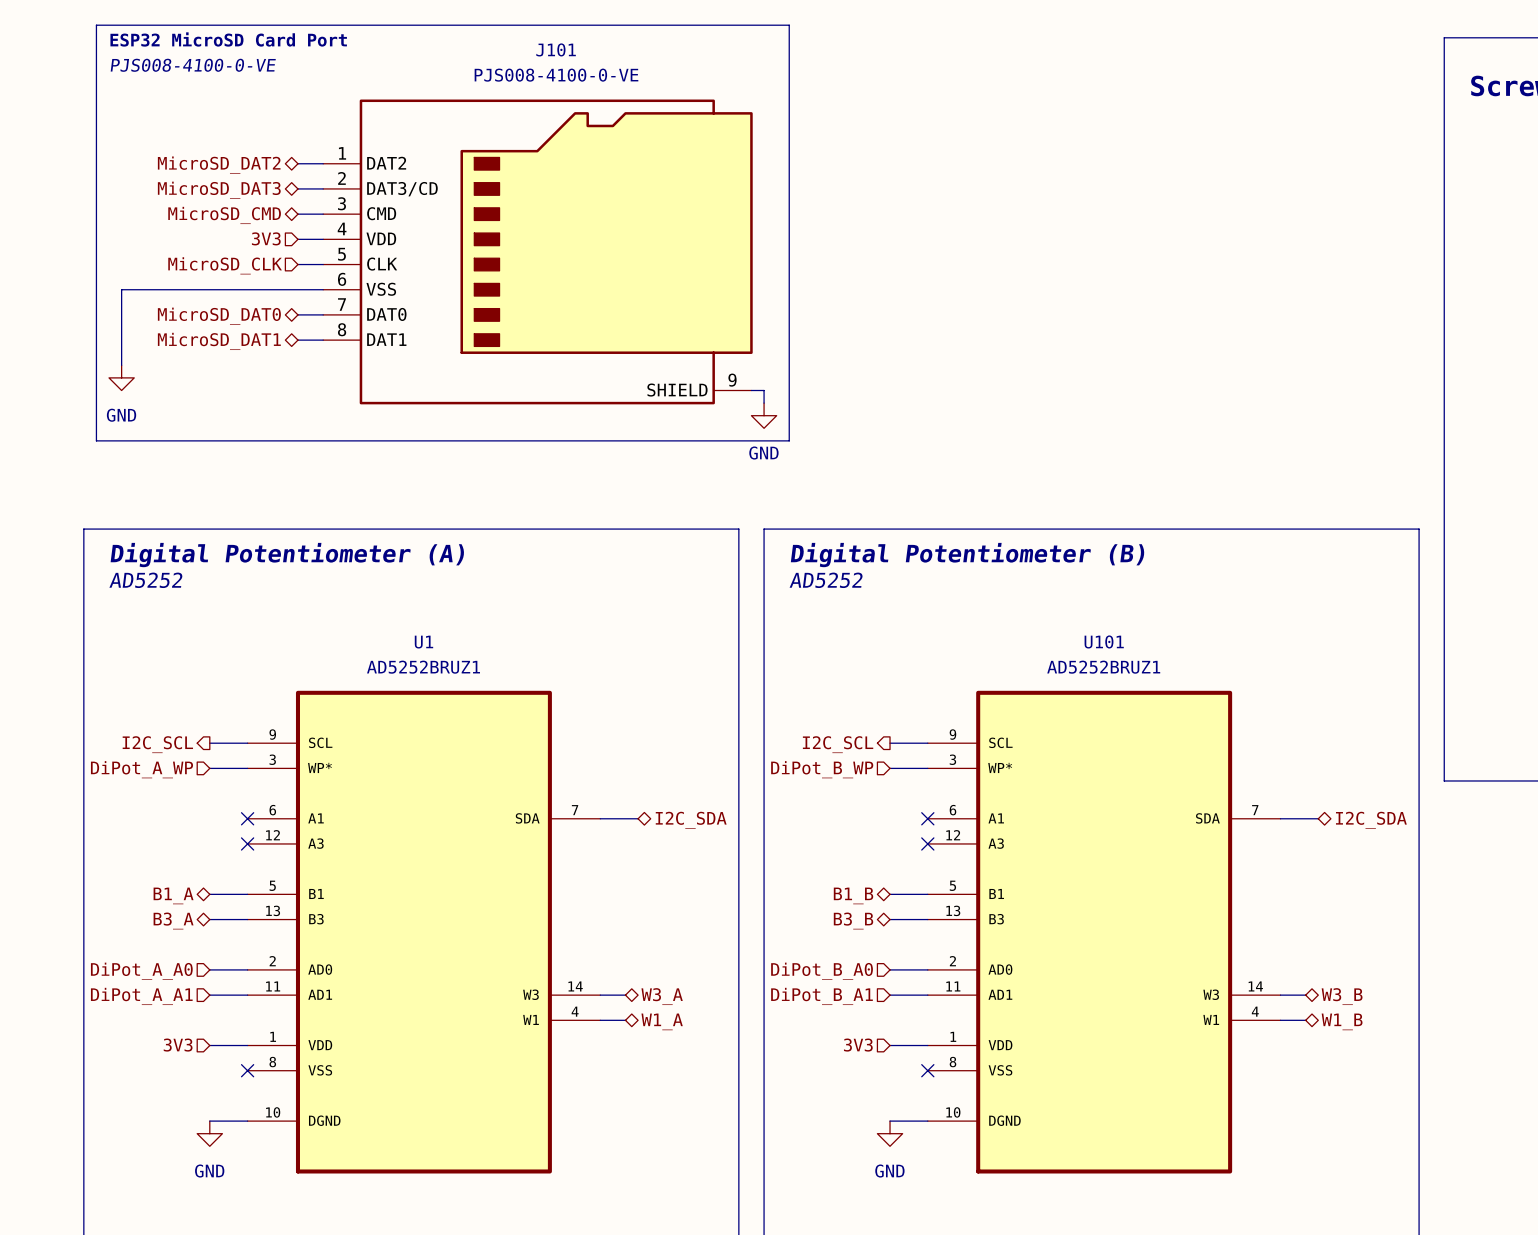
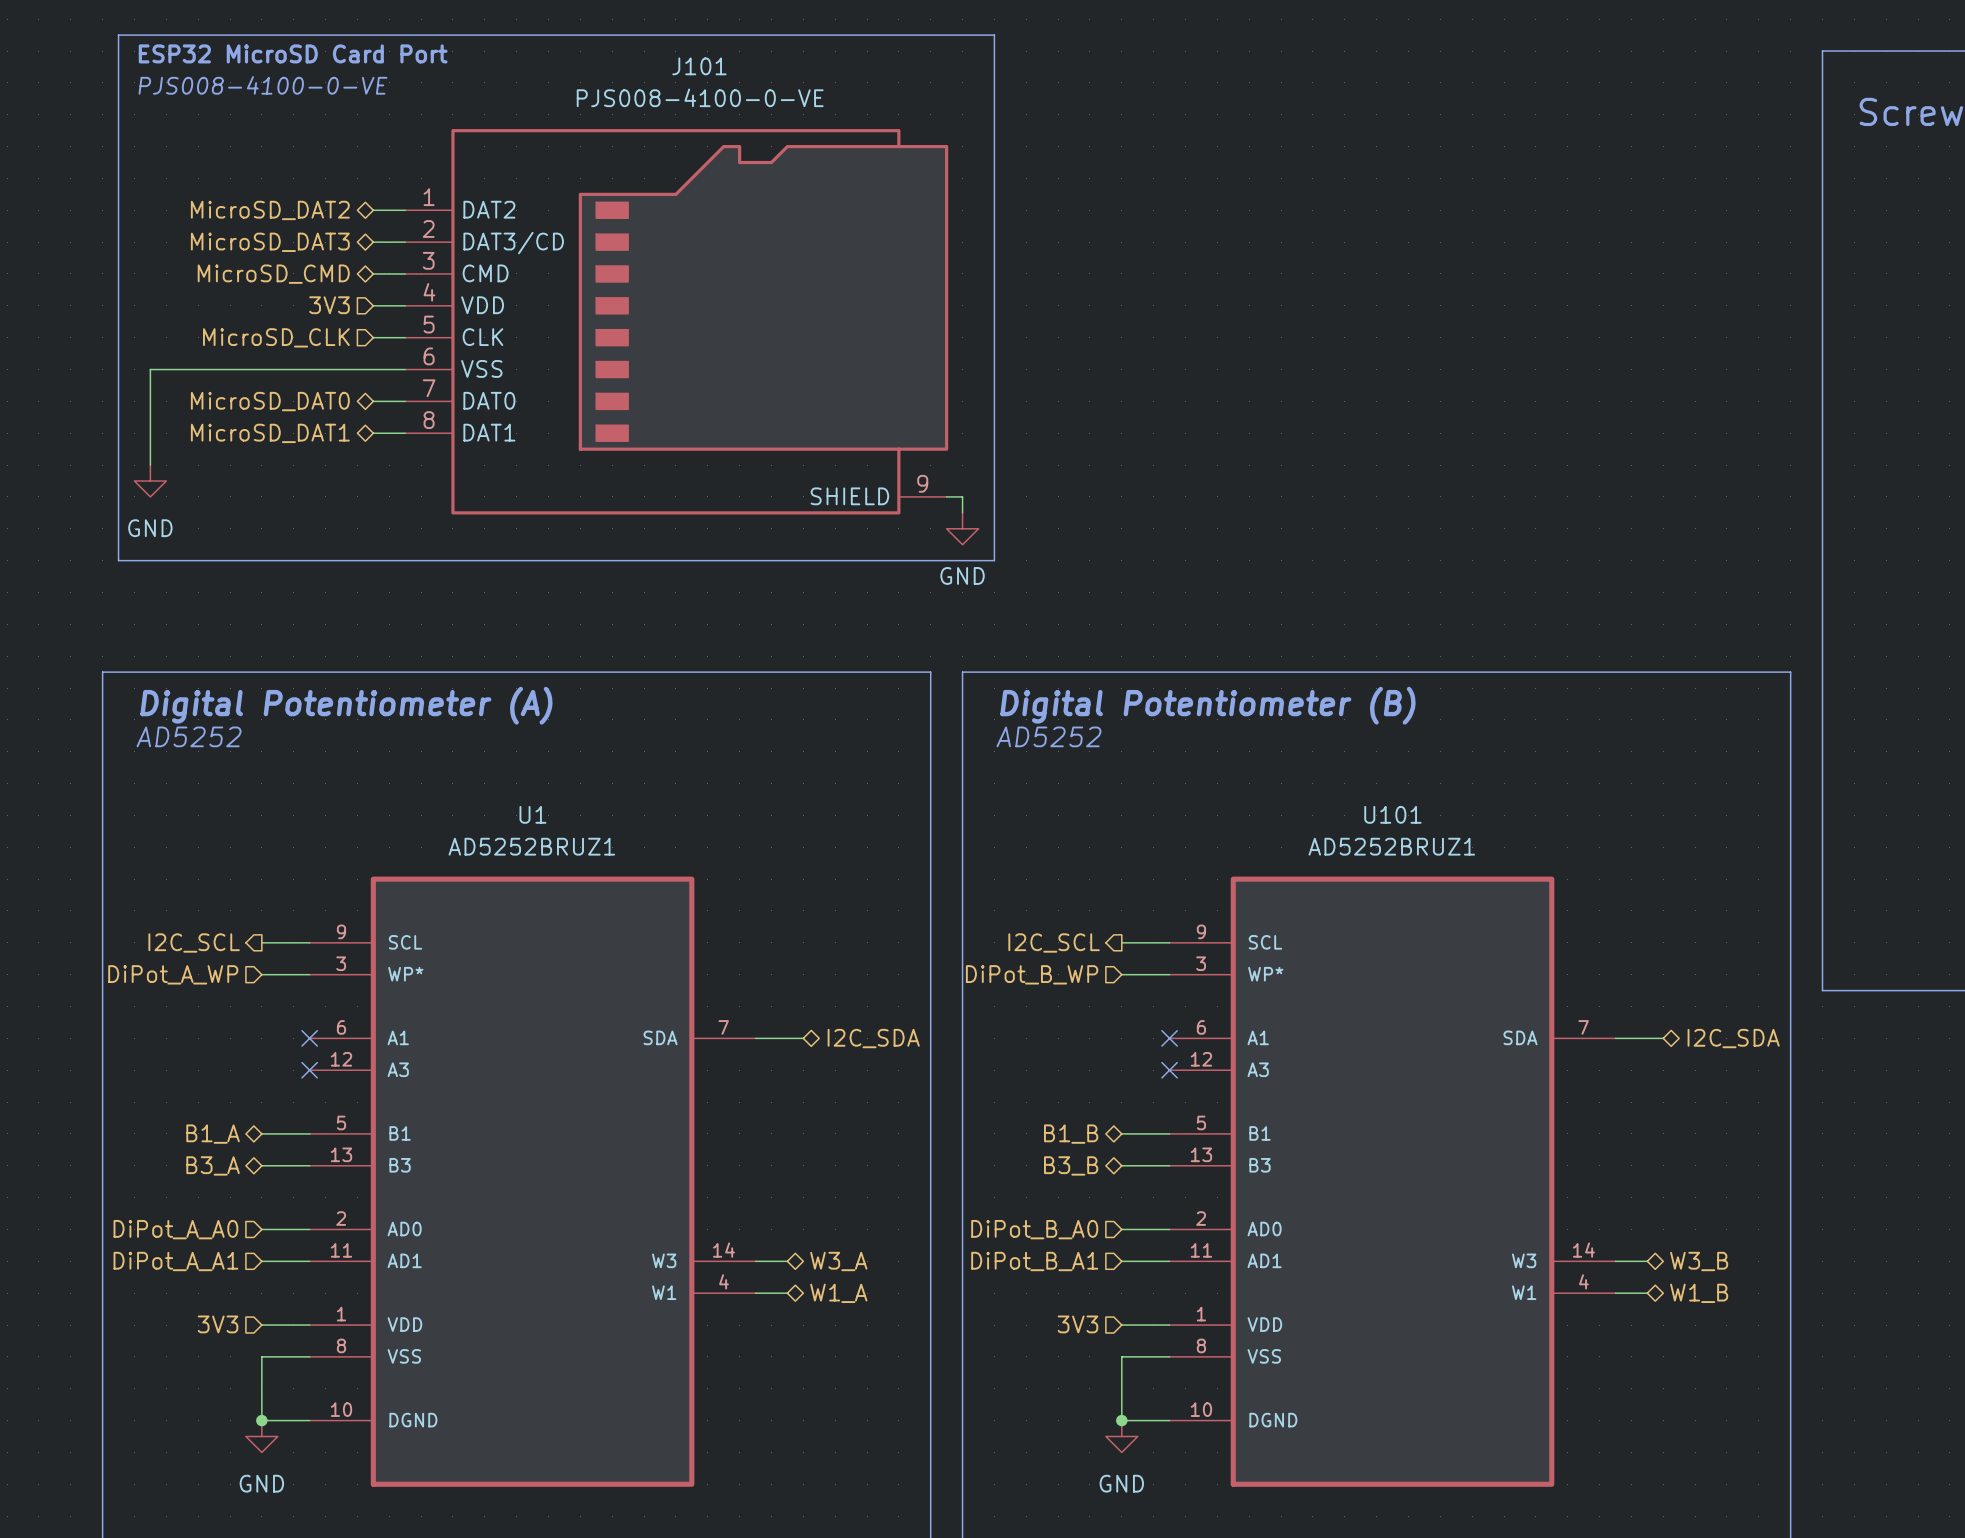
wire: none -> (309, 1356) (261, 1356) (261, 1420)
no-connect mark: (247, 1070) -> none
wire: none -> (1169, 1356) (1121, 1356) (1121, 1420)
no-connect mark: (927, 1070) -> none
junction: none -> (261, 1420)
junction: none -> (1121, 1420)

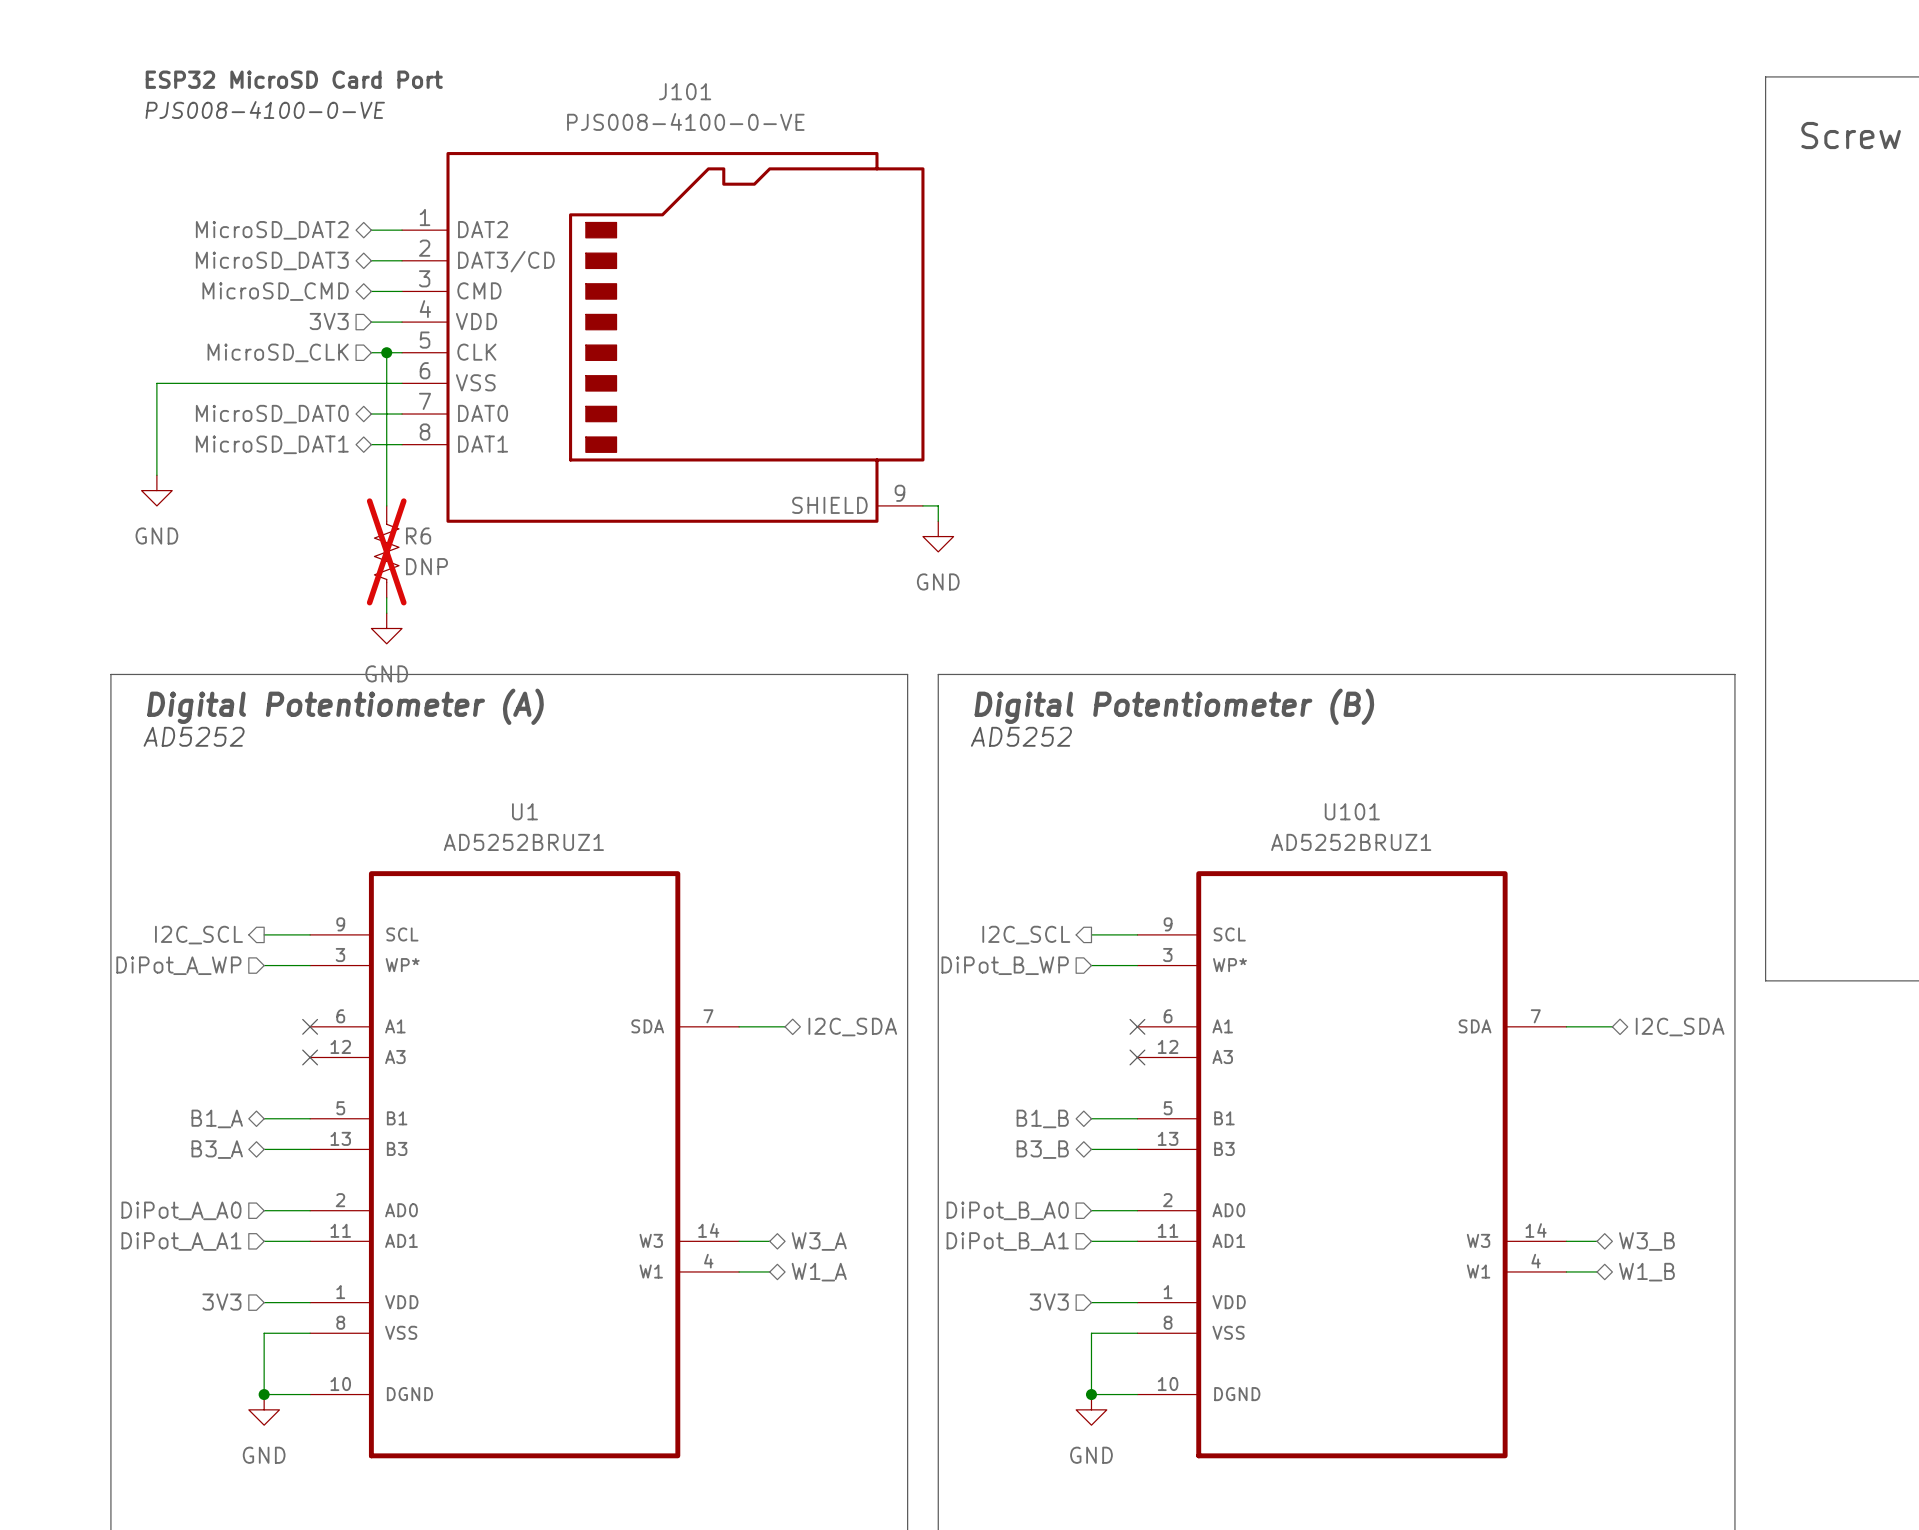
line: (118, 35) (994, 35) (994, 560) (118, 560) (118, 35) -> none
wire: none -> (386, 352) (386, 505)
junction: none -> (386, 352)
R6: none -> DNP (386, 551)
wire: none -> (386, 597) (386, 613)
power symbol: none -> GND (386, 628)

